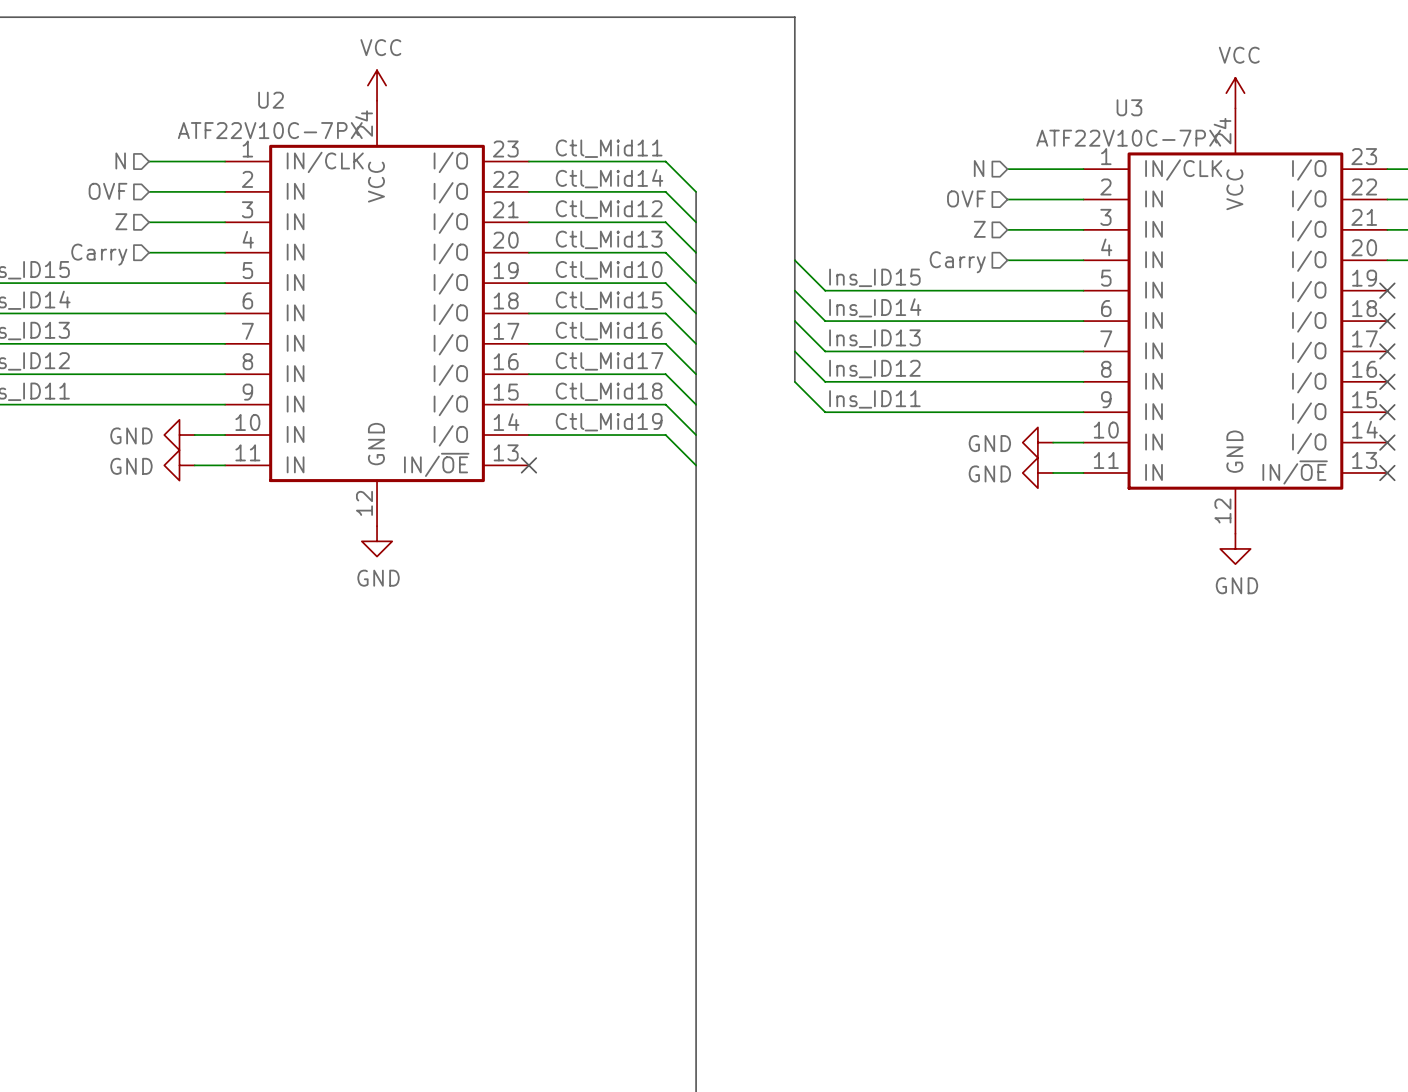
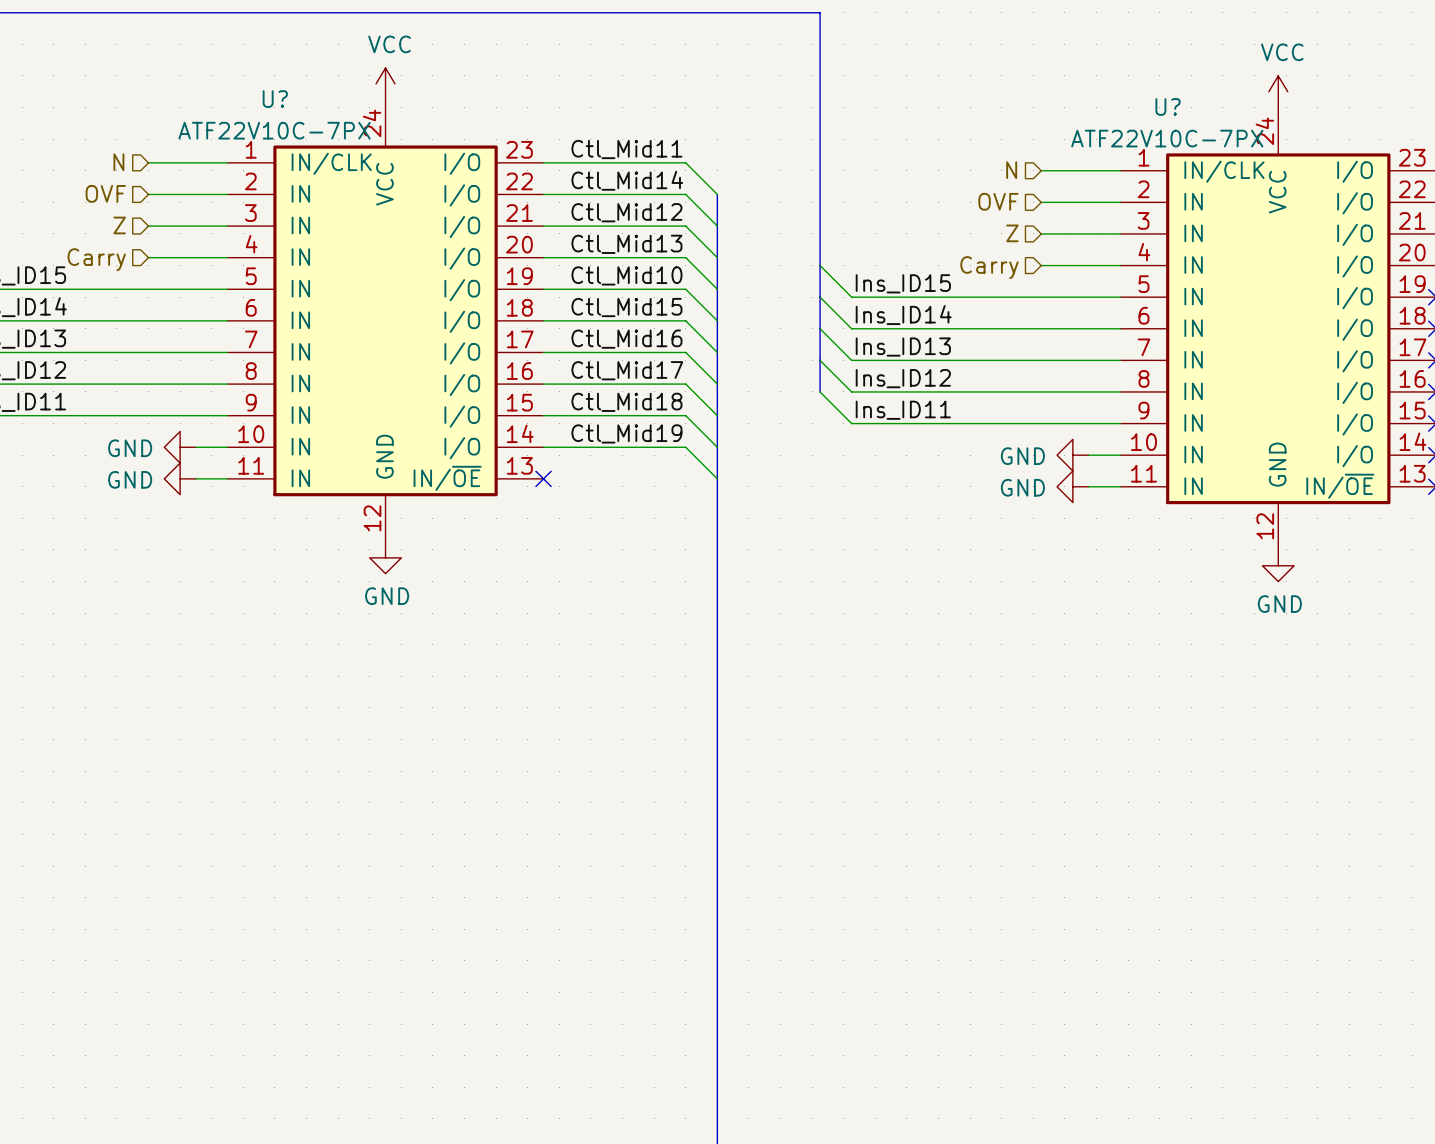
U2 name: U2 (271, 100) -> U? (275, 99)
U3 name: U3 (1129, 107) -> U? (1168, 106)

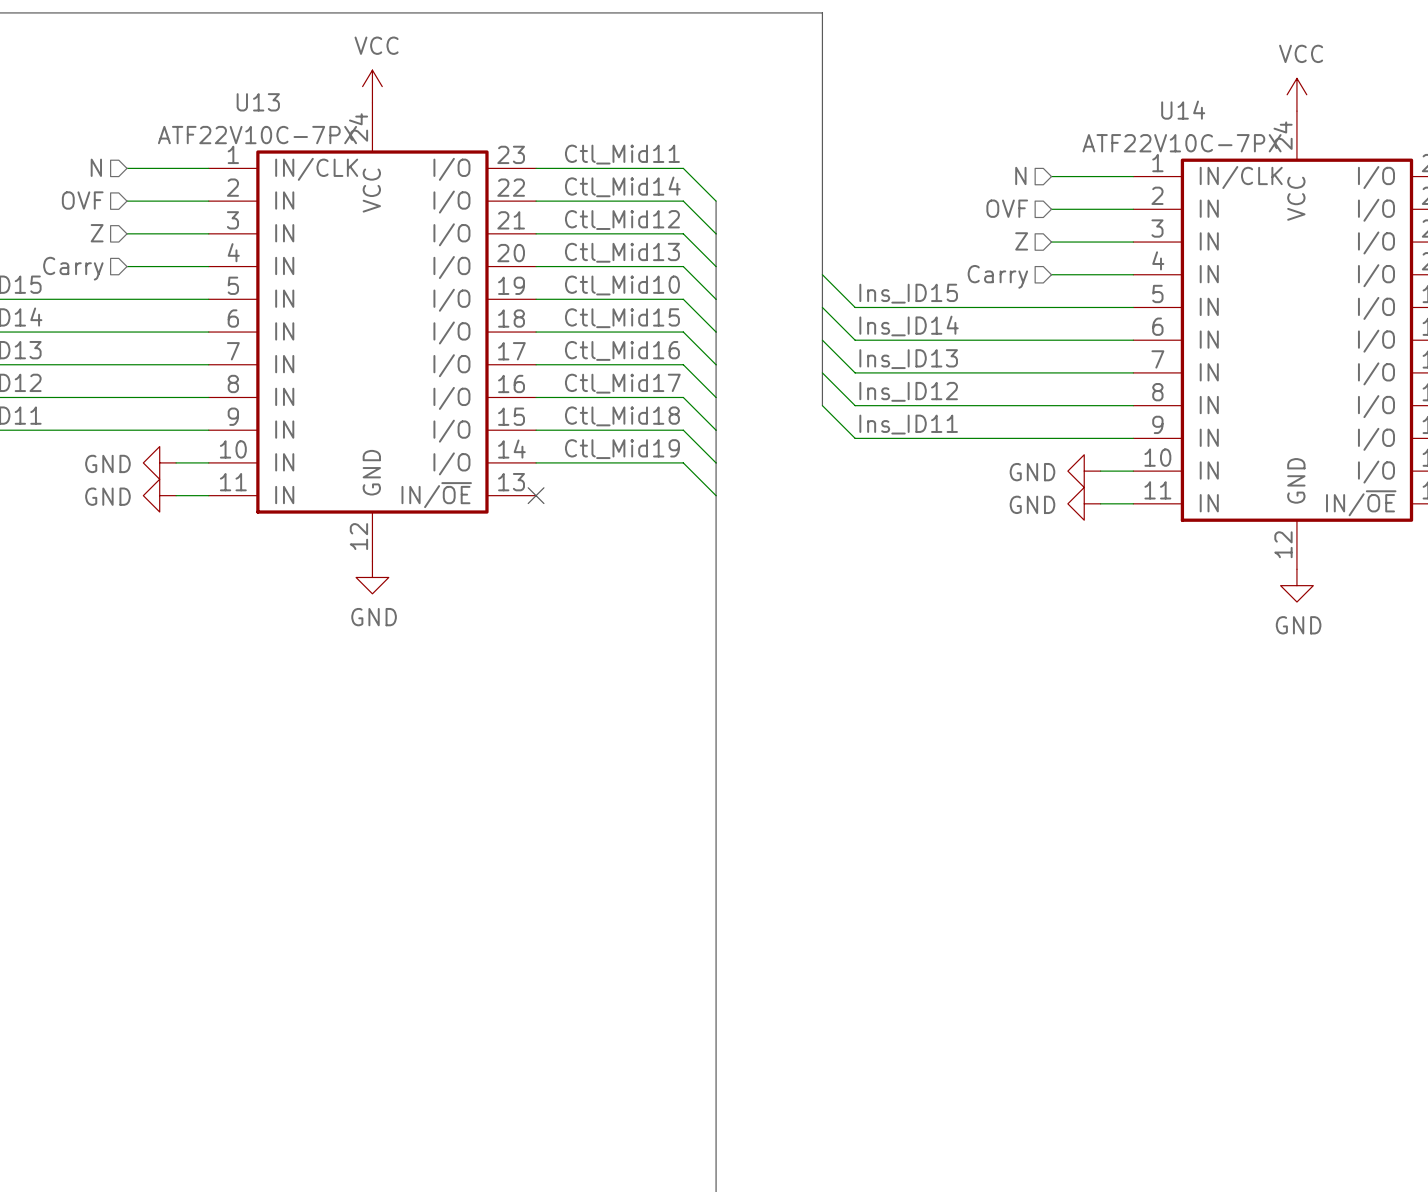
U? name: U? (275, 99) -> U13 (258, 102)
U? name: U? (1168, 106) -> U14 (1183, 110)

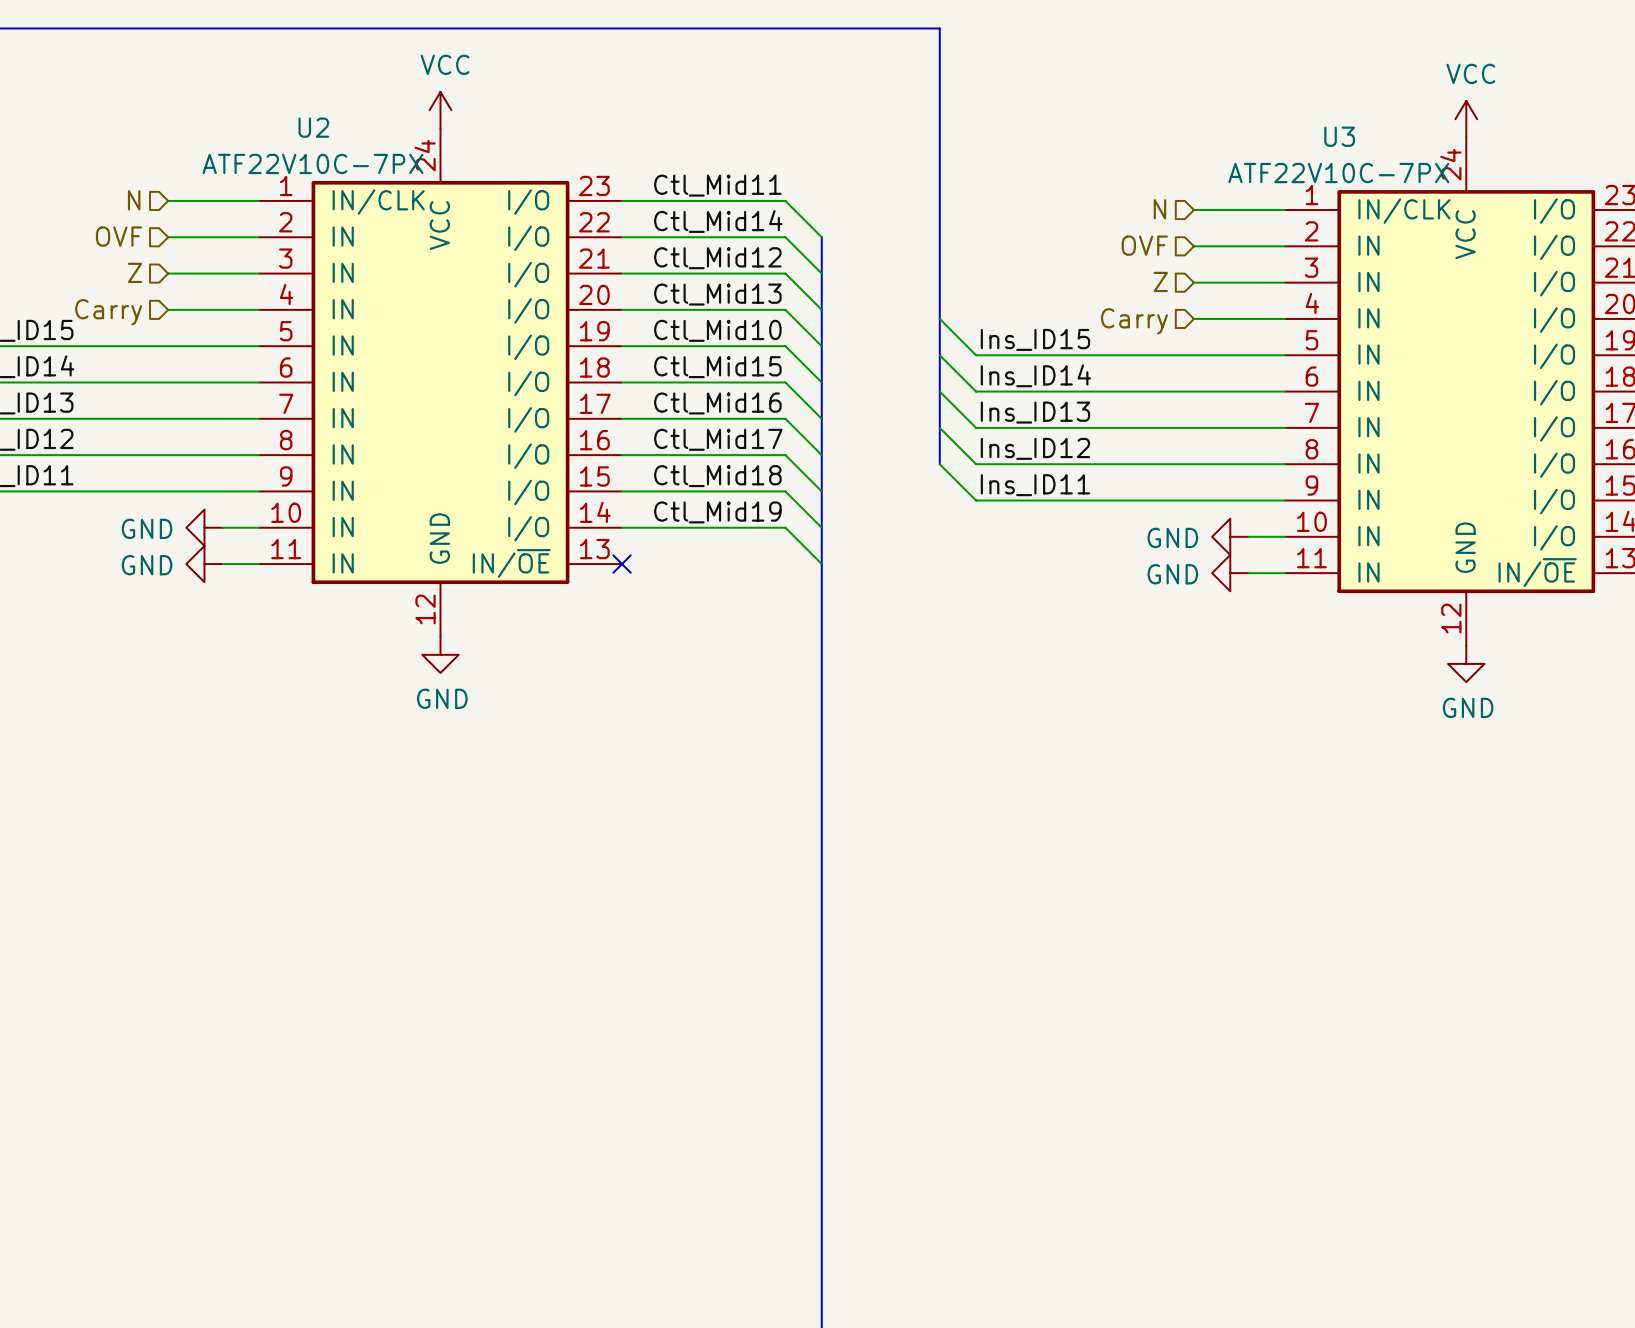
U13 name: U13 (258, 102) -> U2 (313, 127)
U14 name: U14 (1183, 110) -> U3 (1339, 136)

